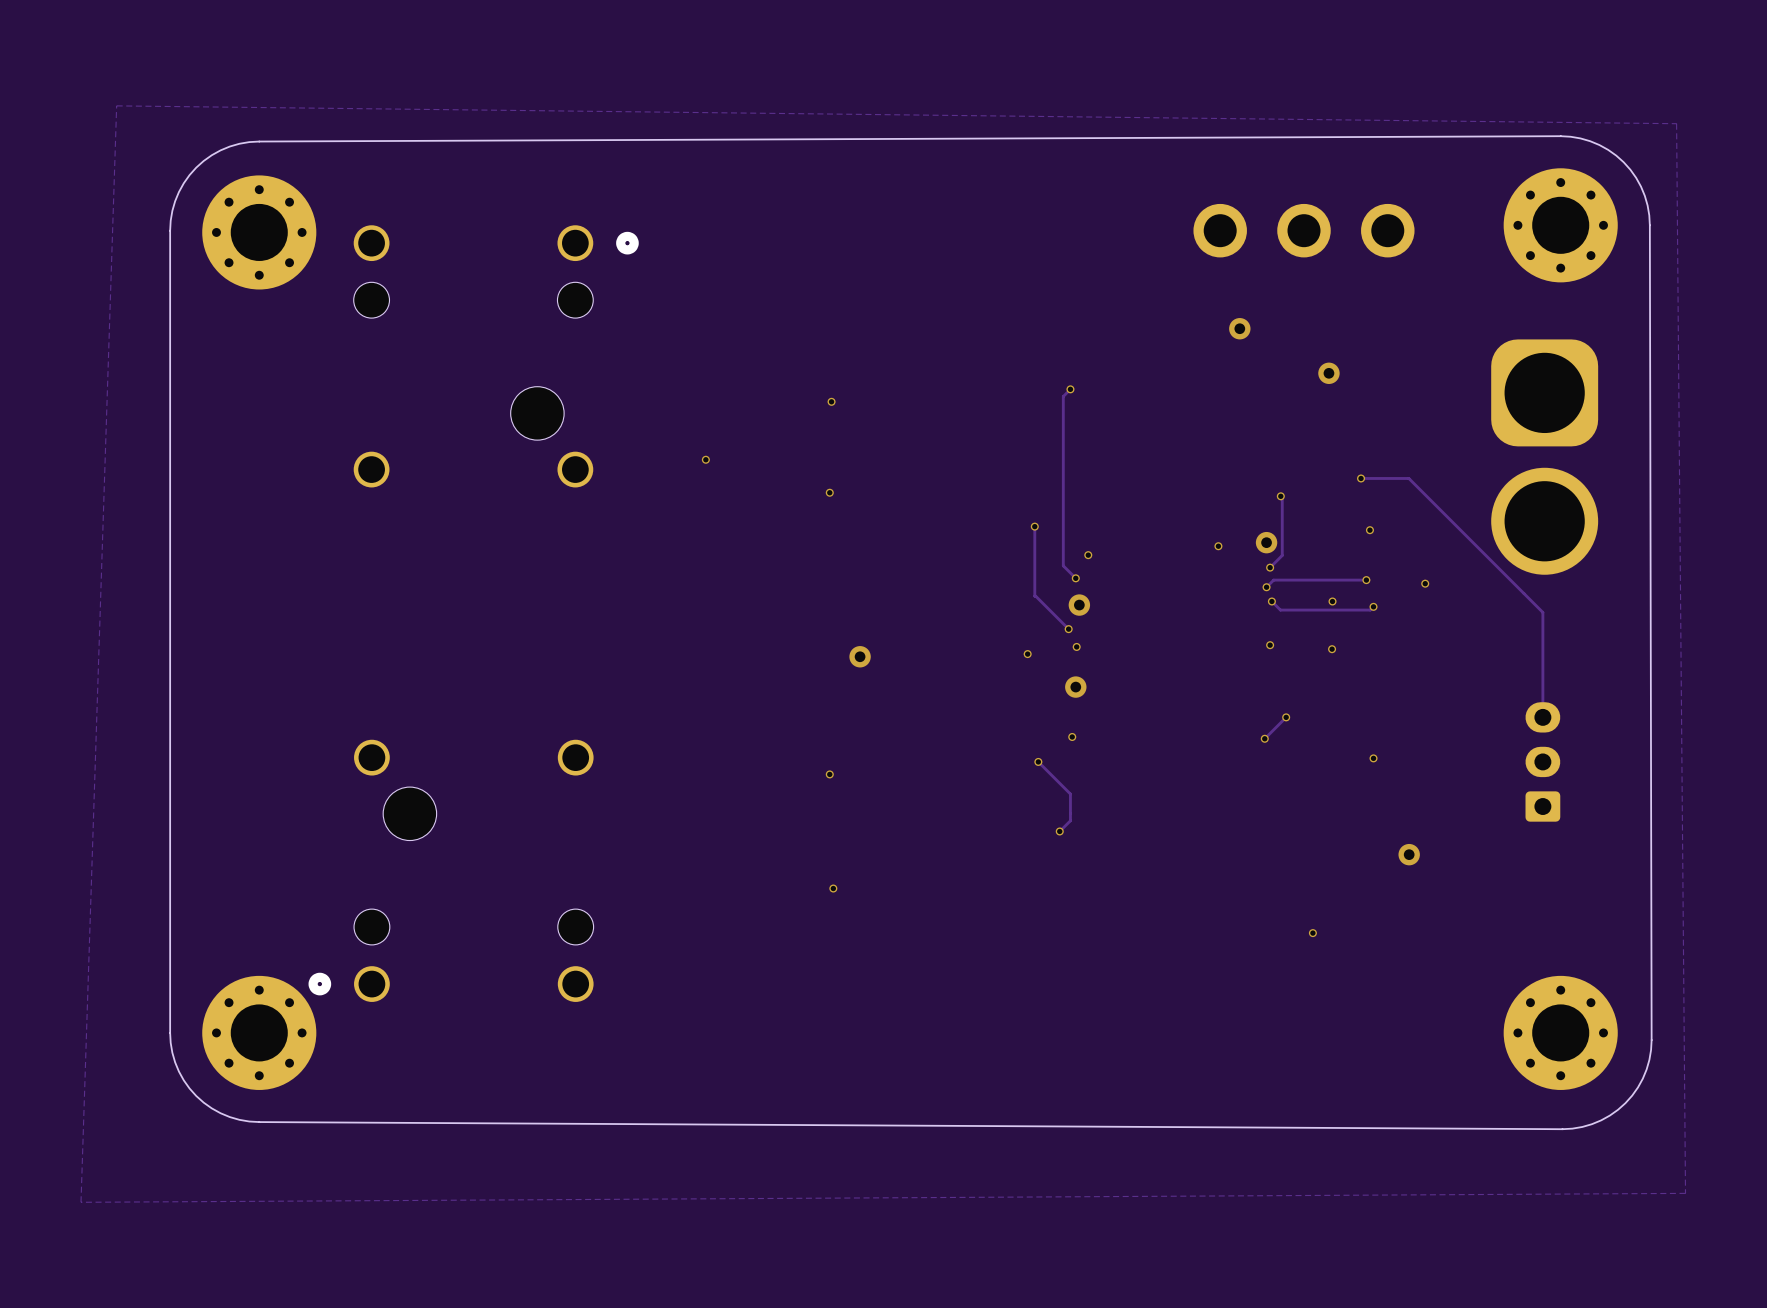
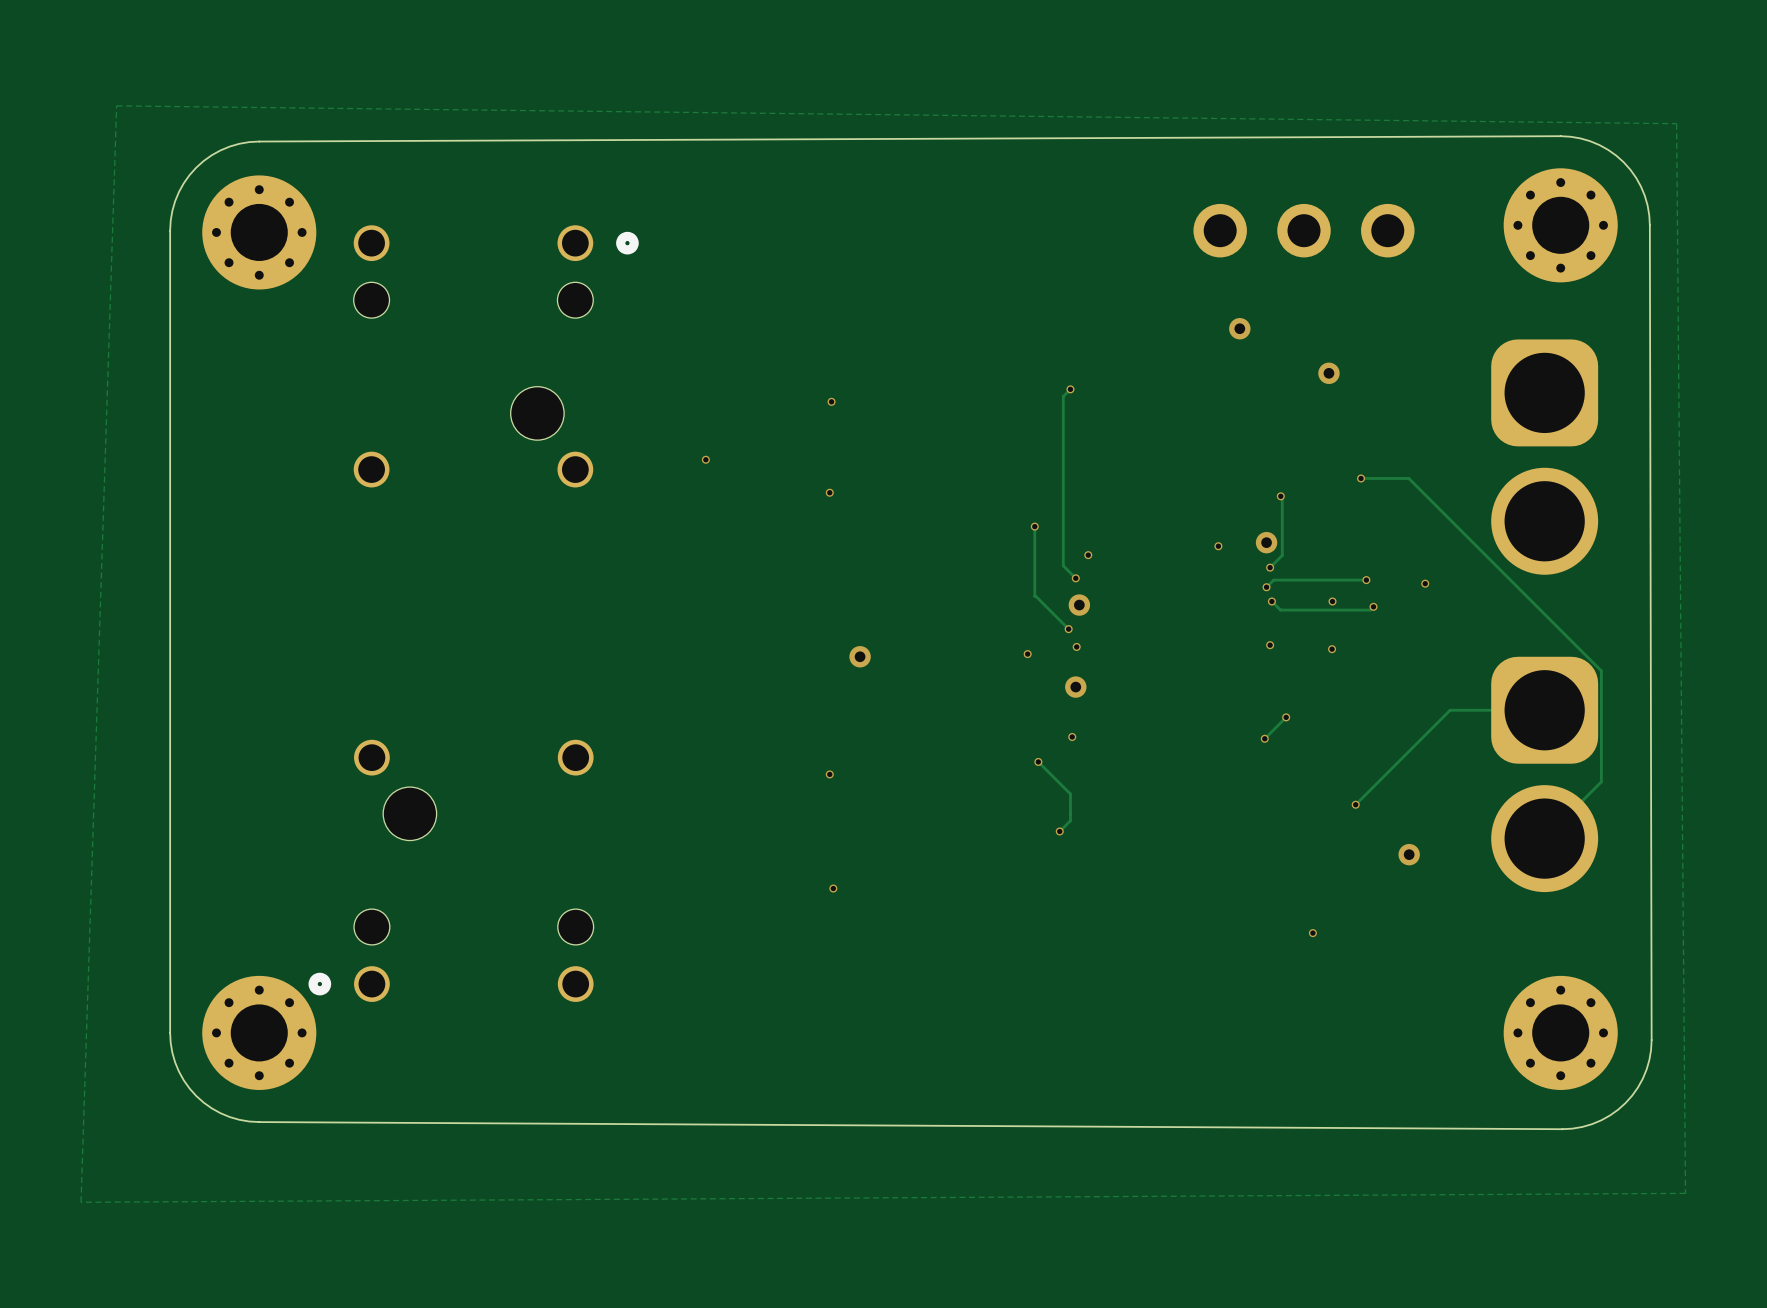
via: (1369, 530) -> none
track: (1542, 612) (1542, 717) -> (1542, 612) (1601, 670) (1601, 781) (1544, 838)
part footprint: [1525, 702, 1561, 822] -> [1491, 656, 1599, 893]
track: none -> (1544, 710) (1450, 710) (1355, 804)
via position: (1373, 758) -> (1355, 804)

